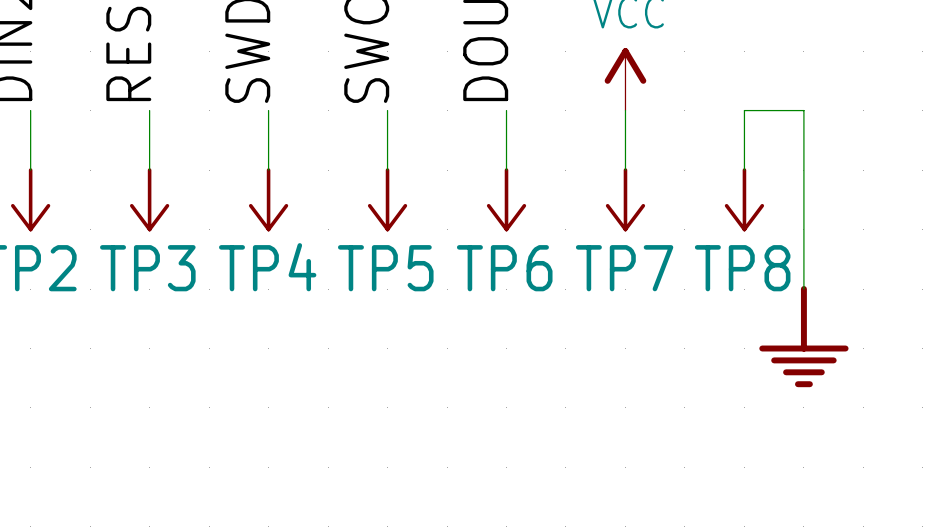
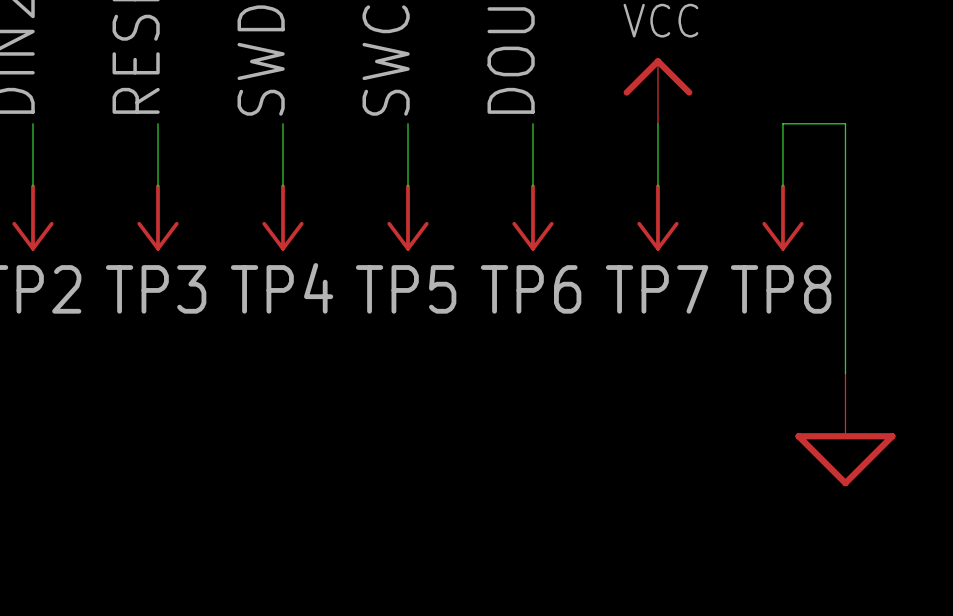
power symbol shape: [604, 48, 647, 111] -> [623, 58, 693, 124]
power symbol: (803, 336) -> none
power symbol: none -> (845, 430)

